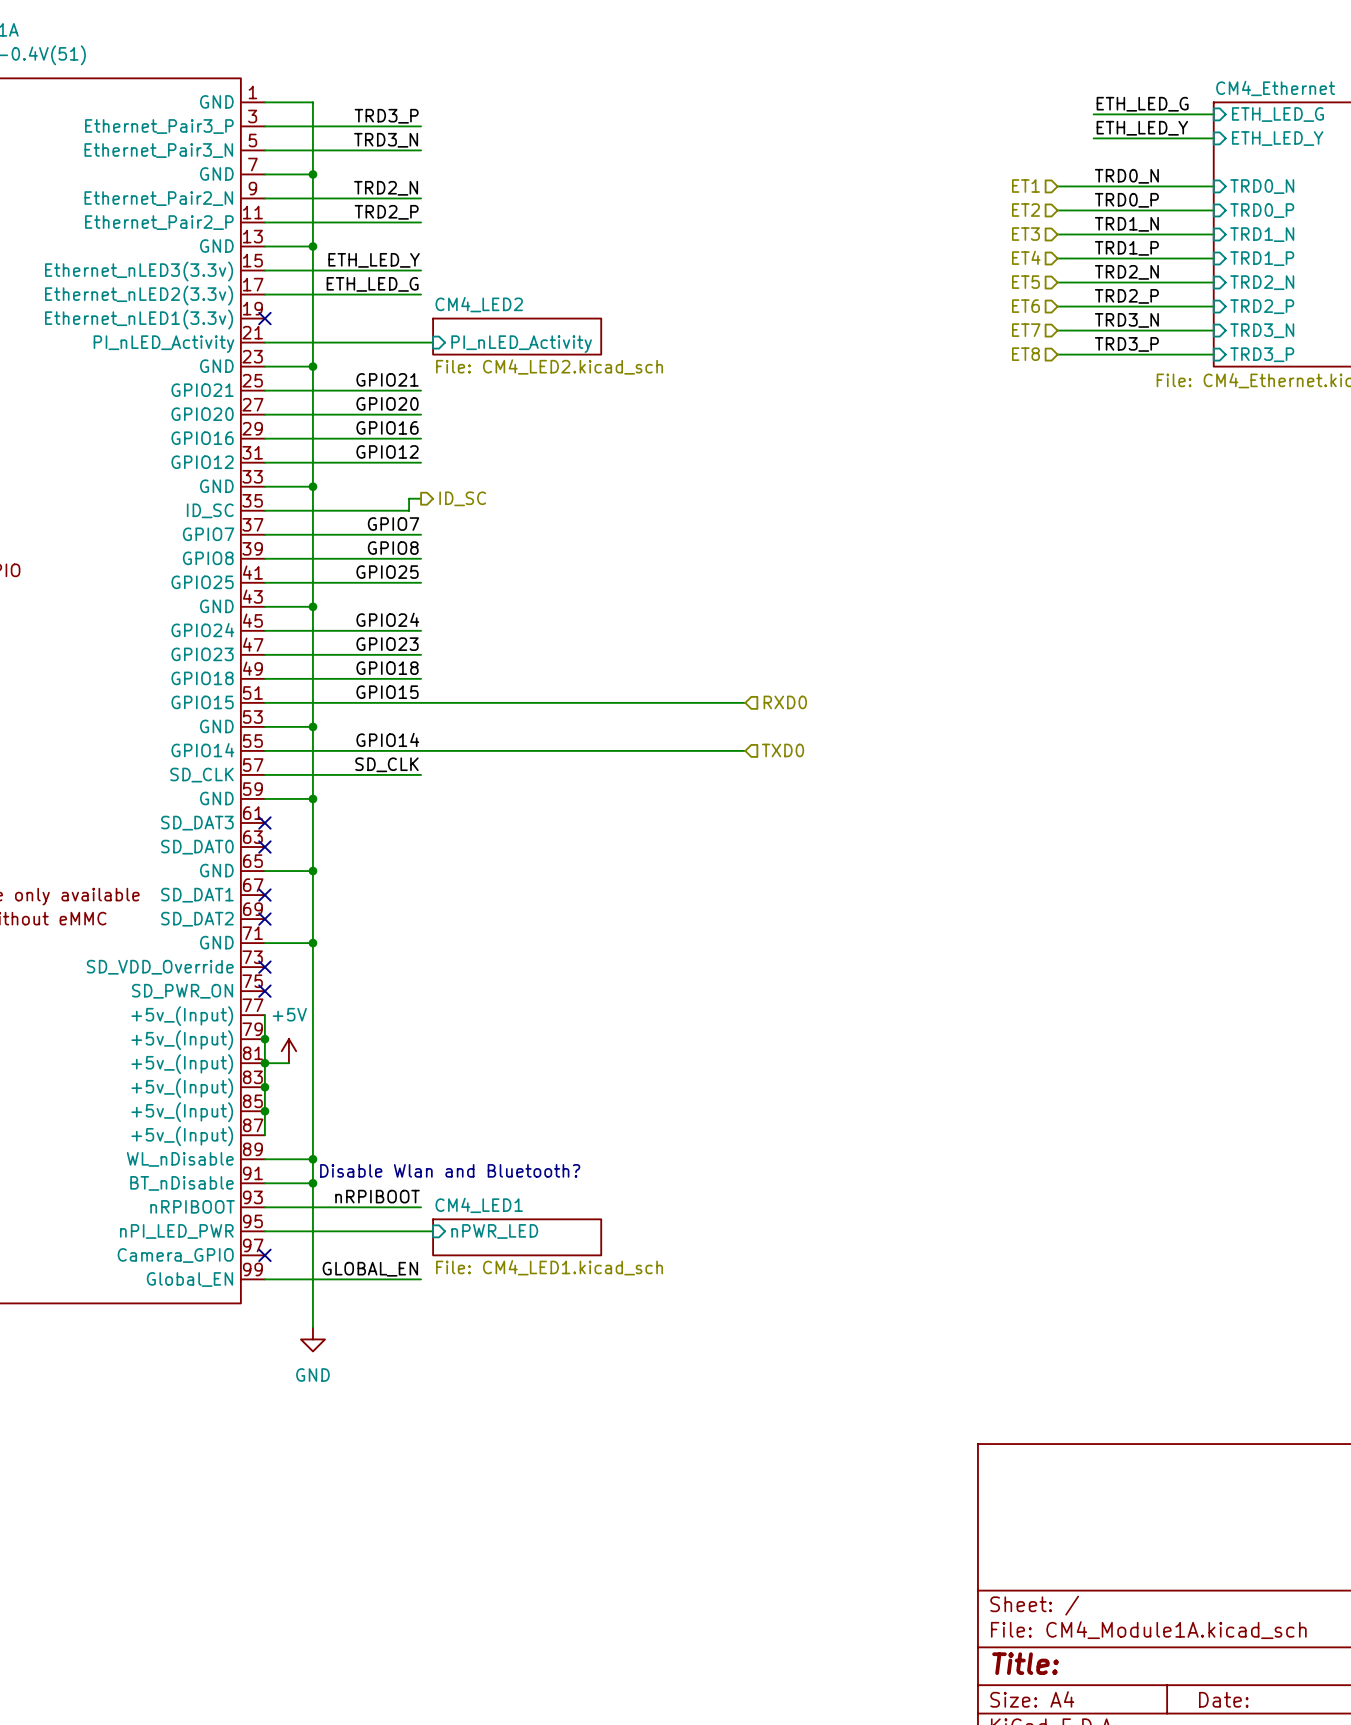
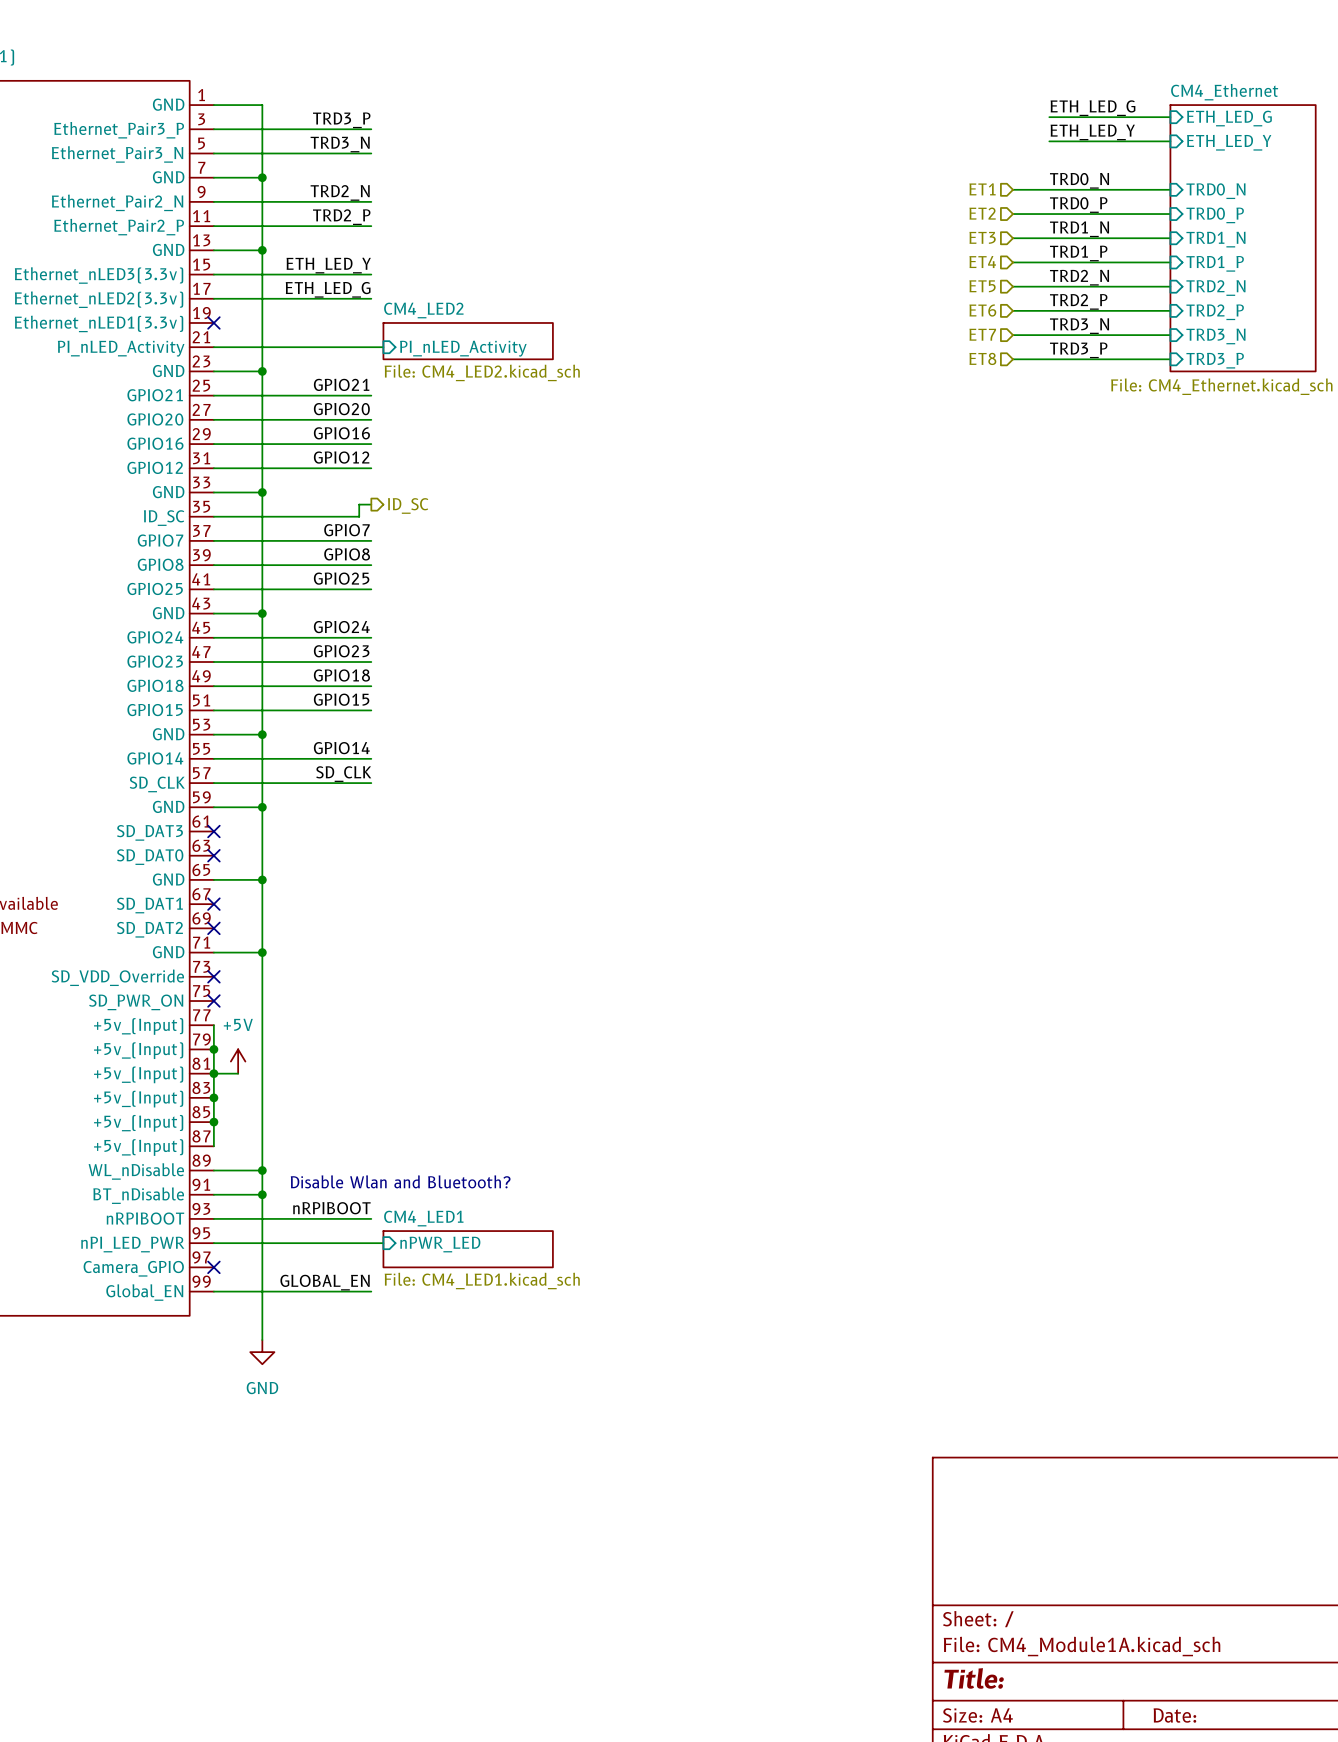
wire: (421, 702) (745, 702) -> none
hierarchical label: RXD0 (785, 702) -> none
wire: (421, 750) (745, 750) -> none
hierarchical label: TXD0 (782, 750) -> none

